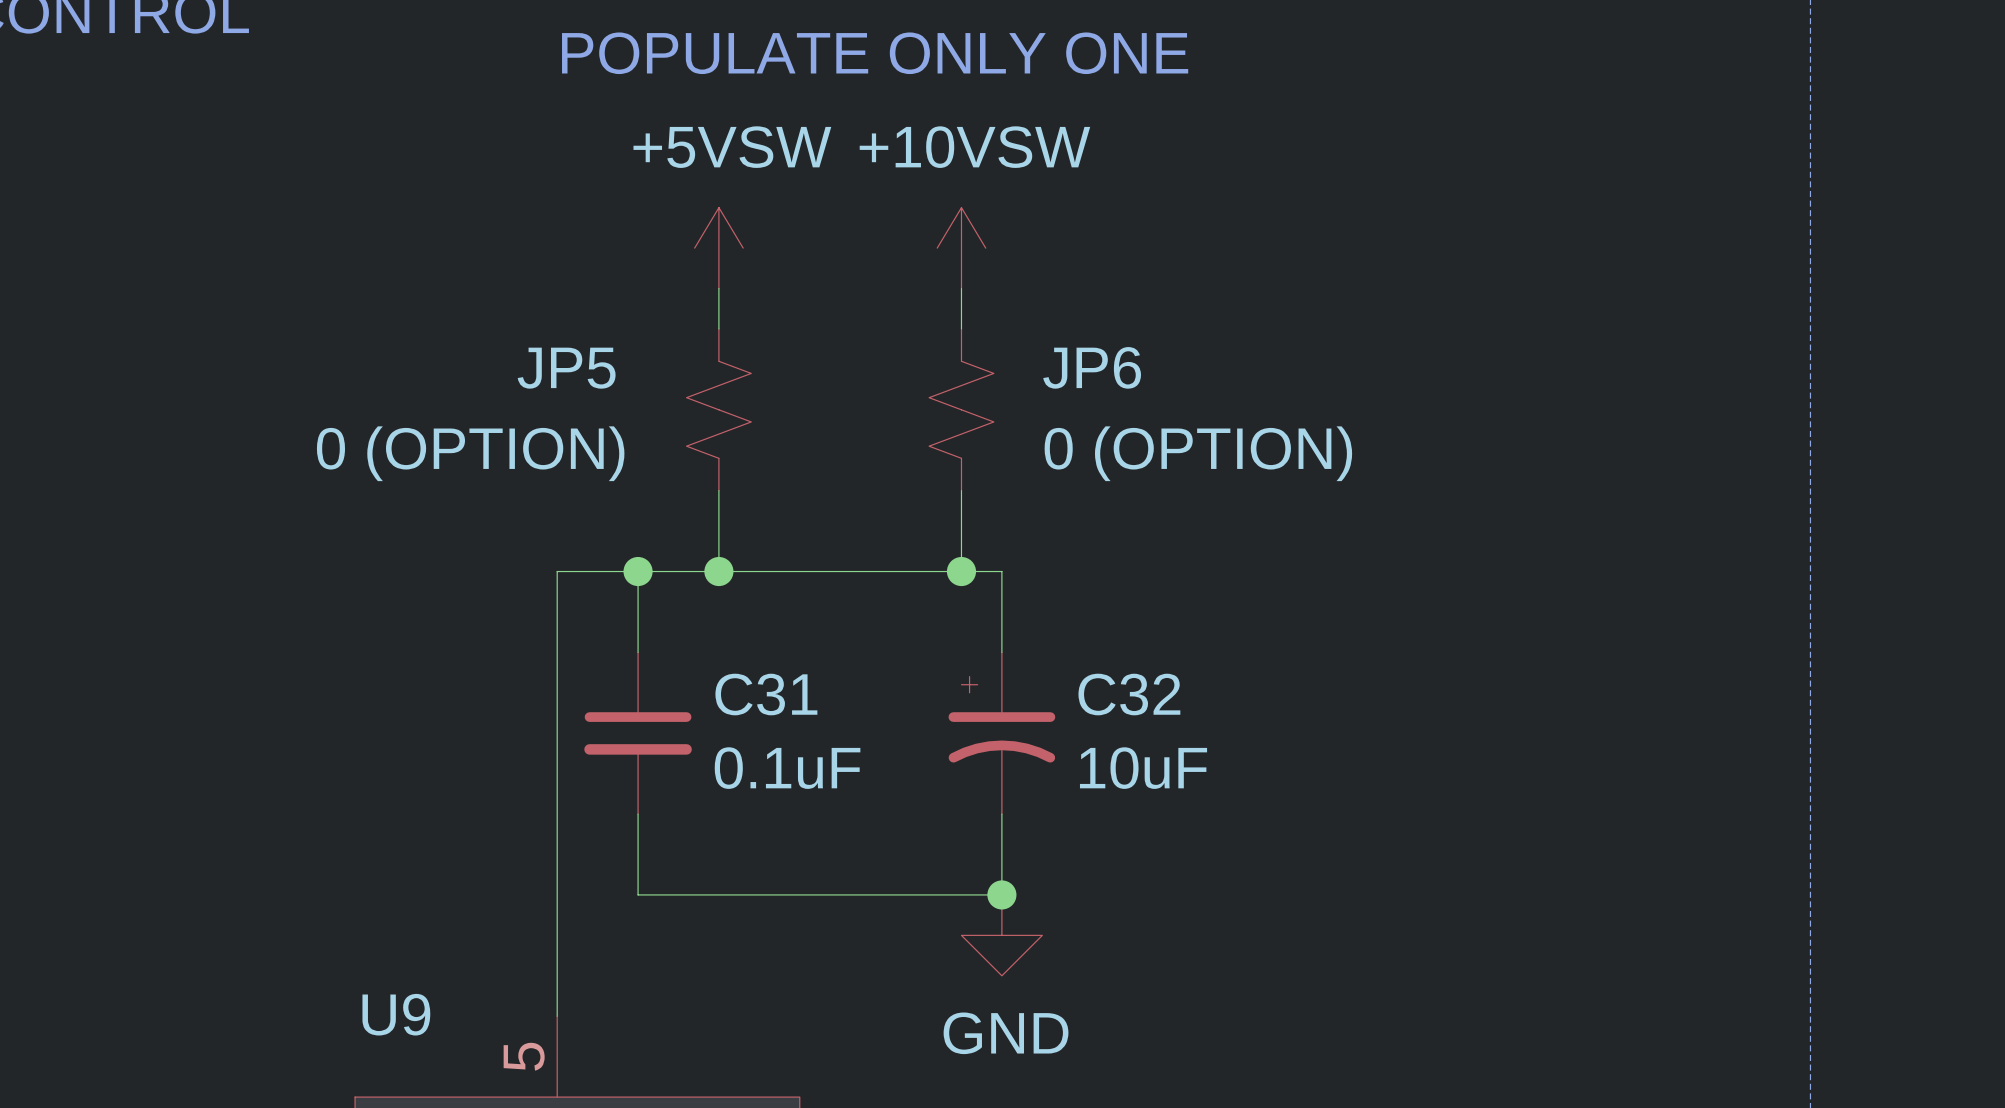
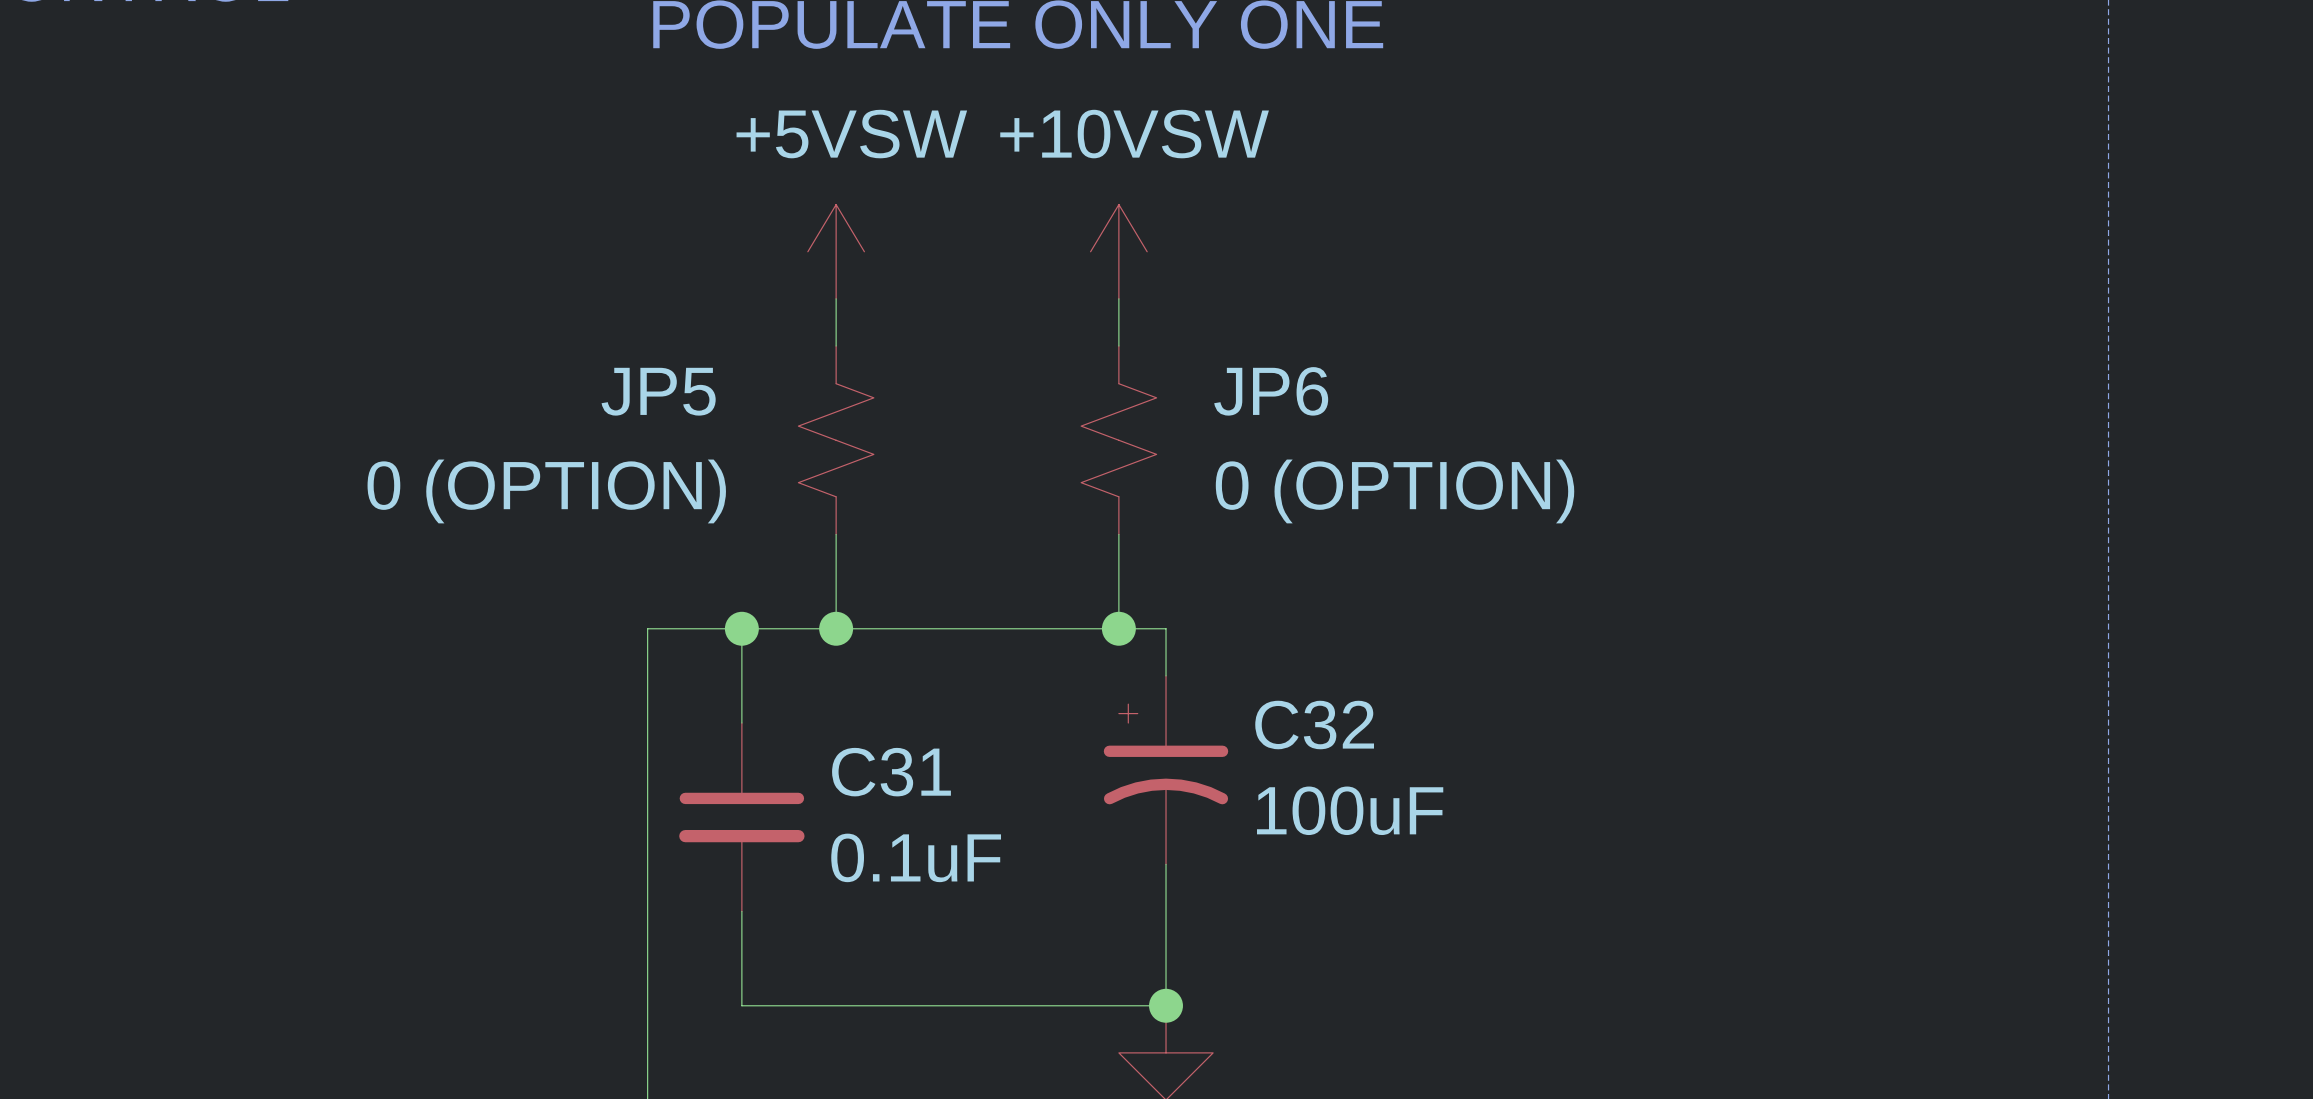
C32 position: (1001, 733) -> (1166, 770)
C32 value: 10uF (1143, 768) -> 100uF (1350, 810)

